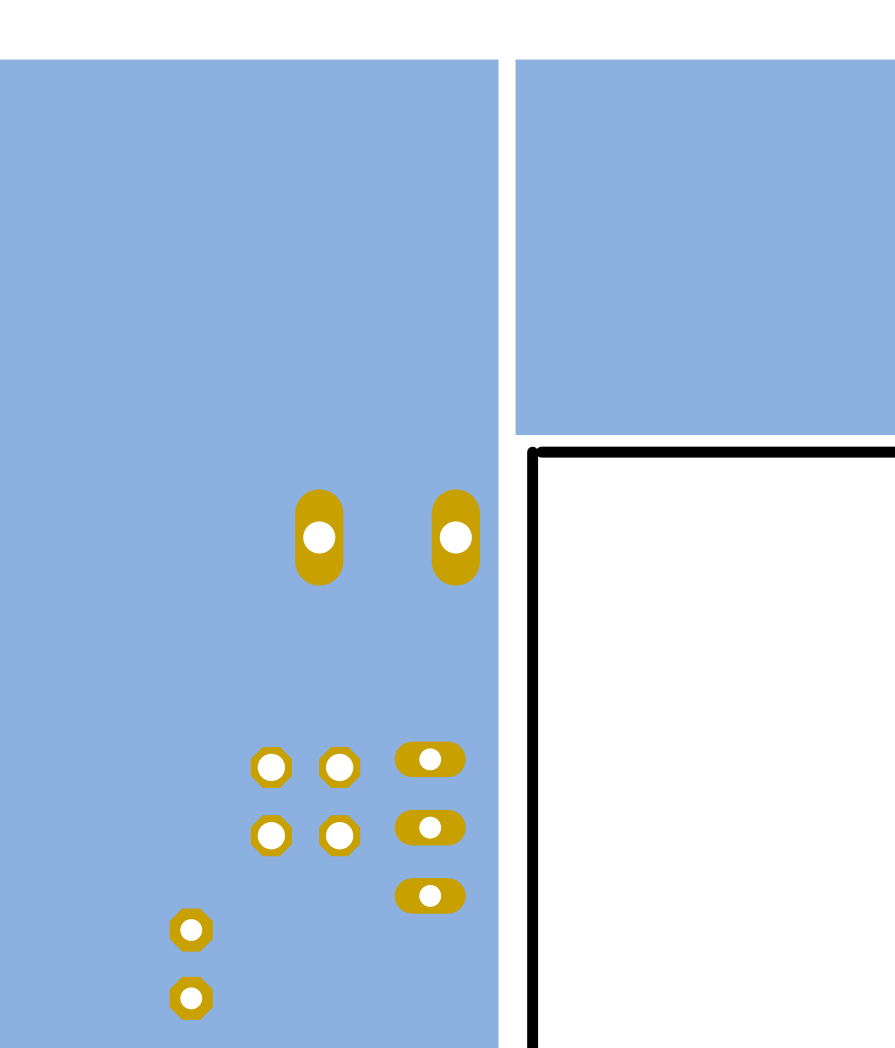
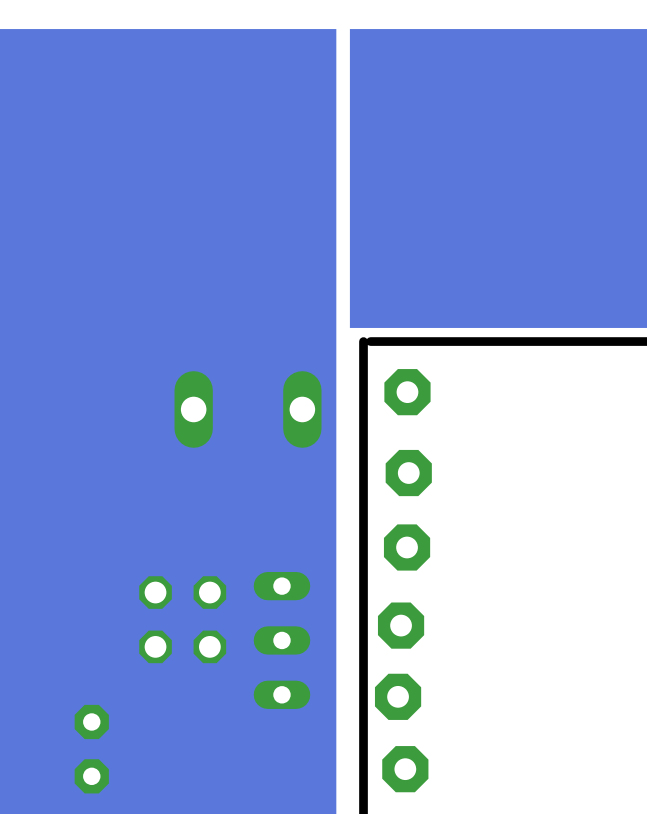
part: none -> (407, 392)
part: none -> (408, 473)
part: none -> (407, 547)
part: none -> (401, 625)
part: none -> (398, 696)
part: none -> (405, 769)

